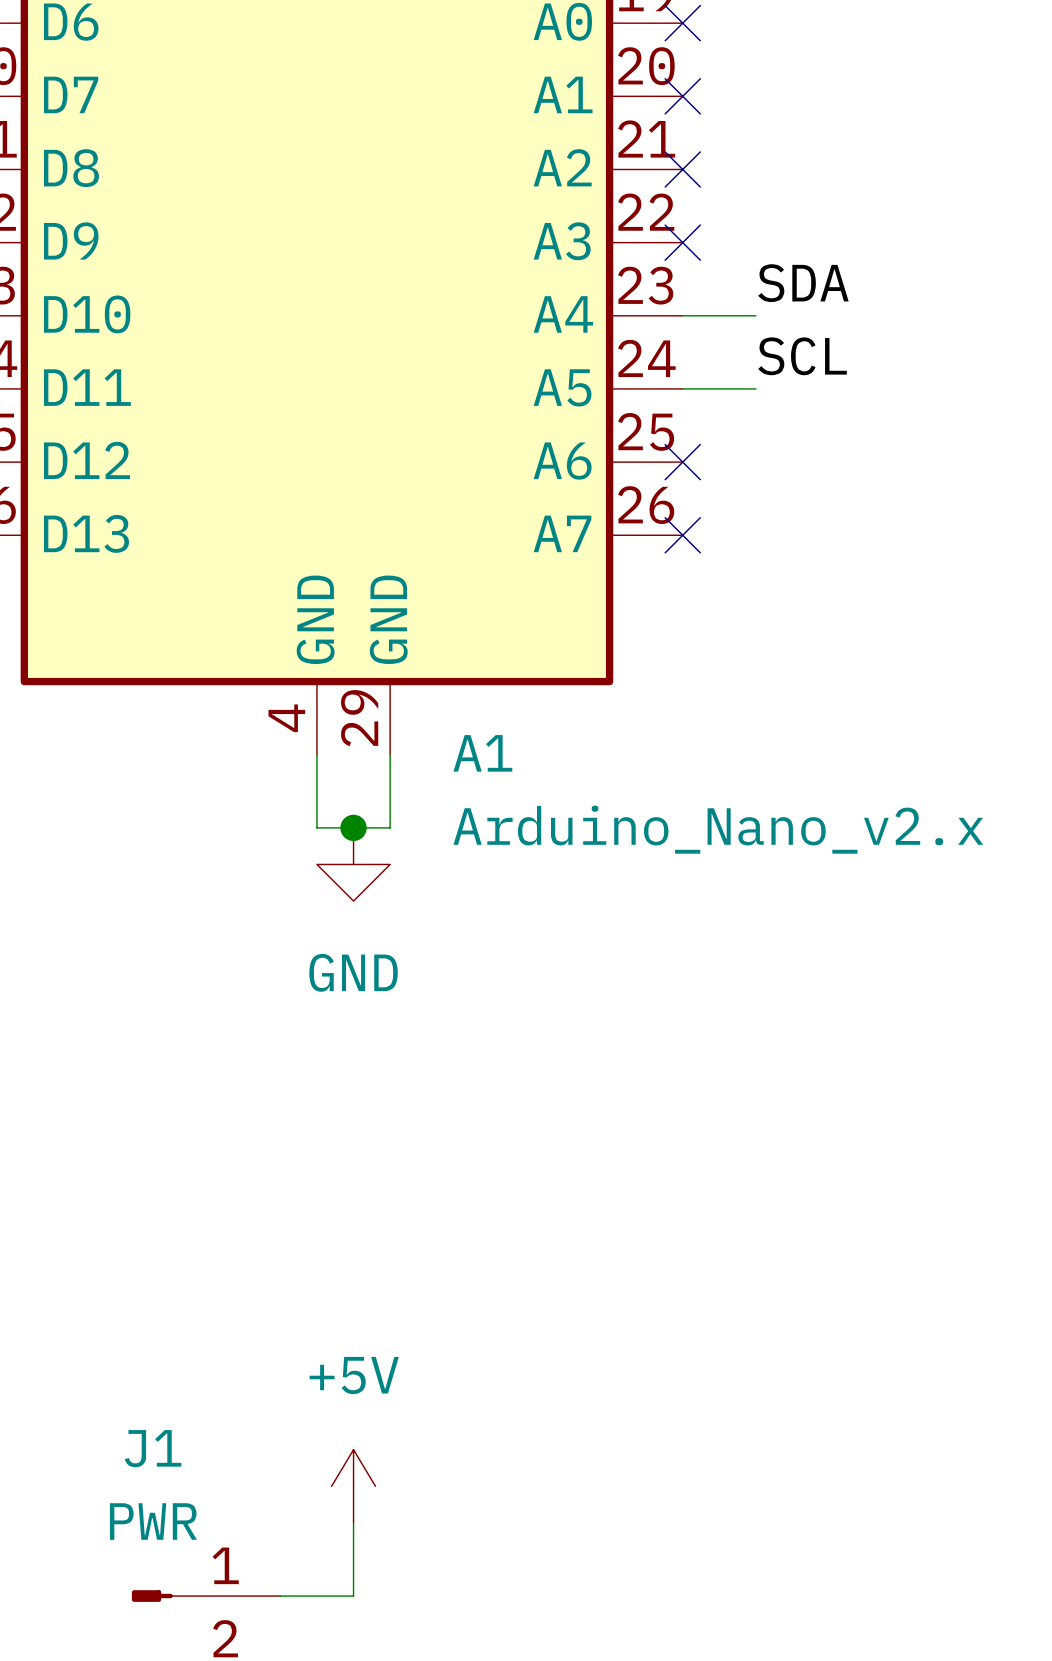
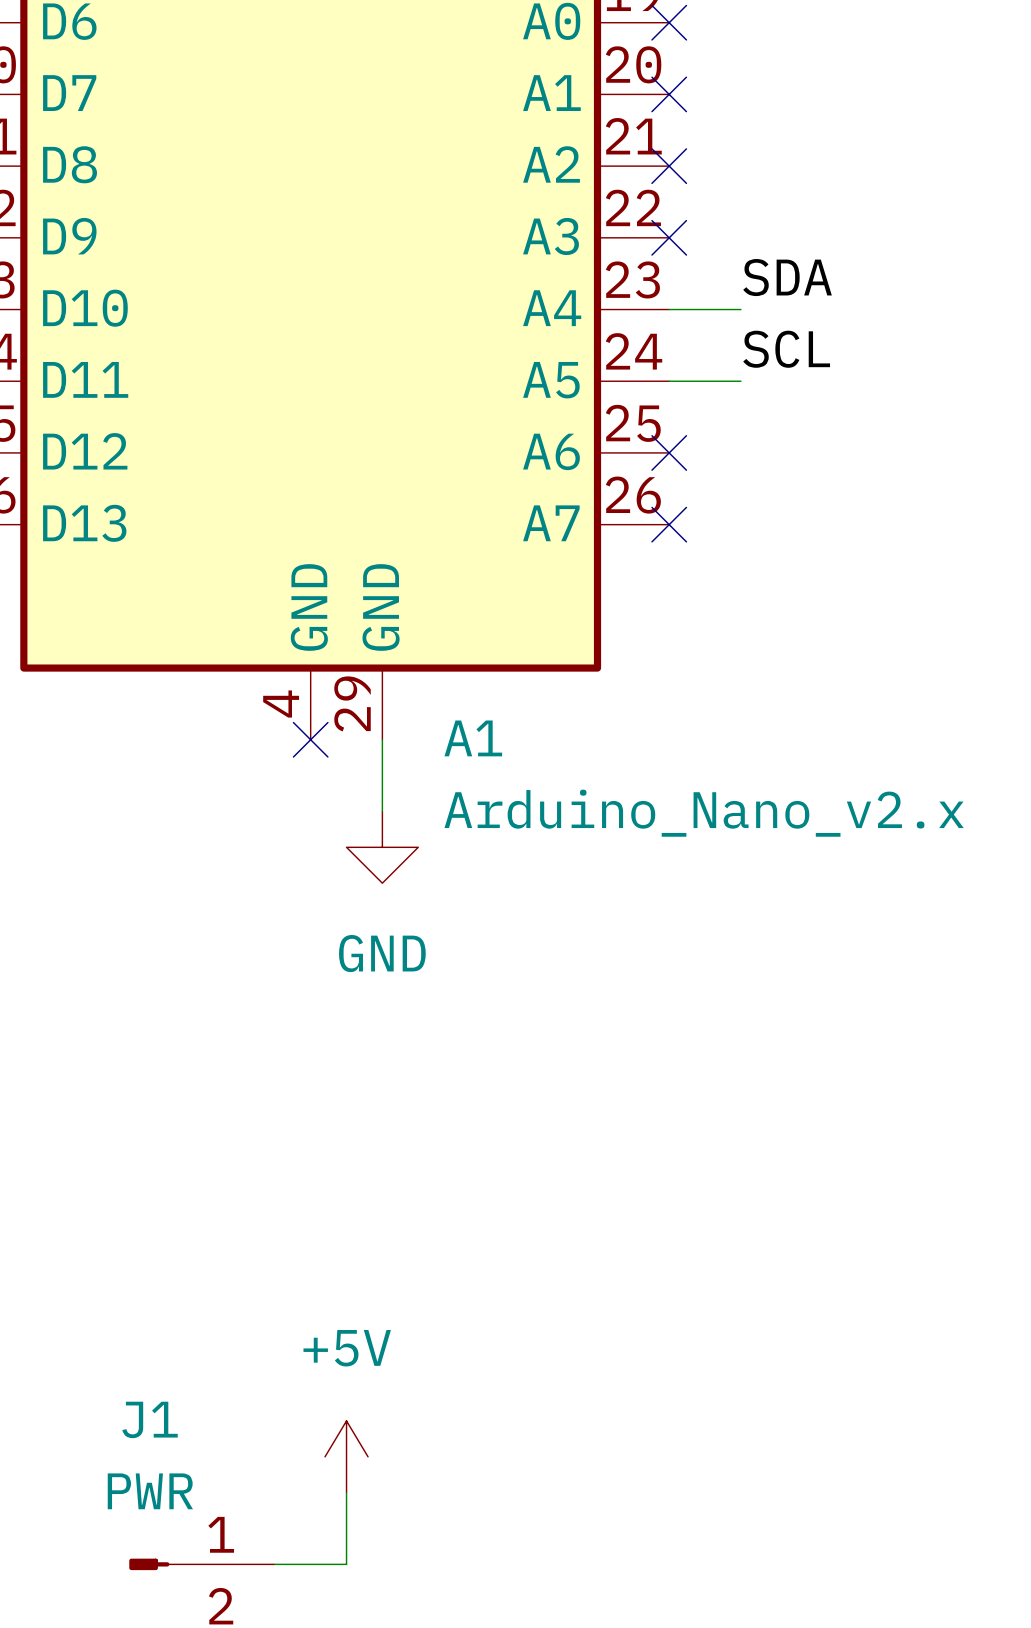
wire: (316, 754) (316, 827) (390, 827) -> none
no-connect mark: none -> (310, 739)
junction: (353, 827) -> none
power symbol position: GND (353, 864) -> GND (382, 847)

